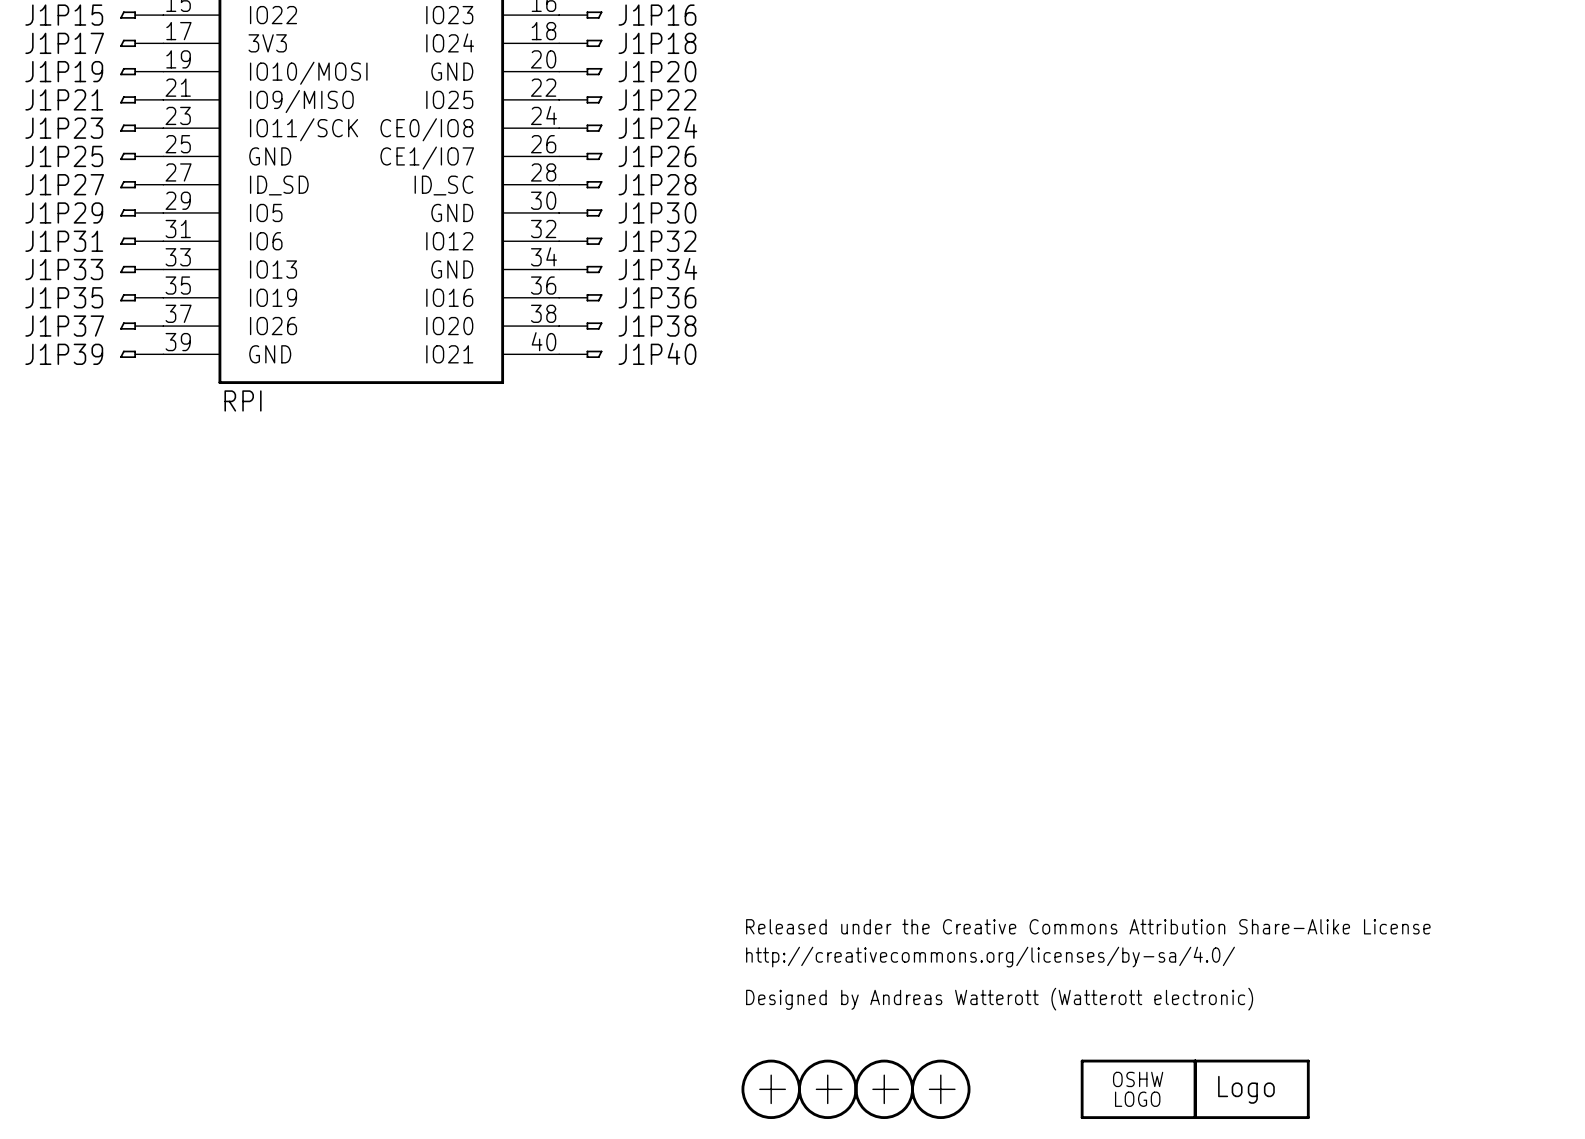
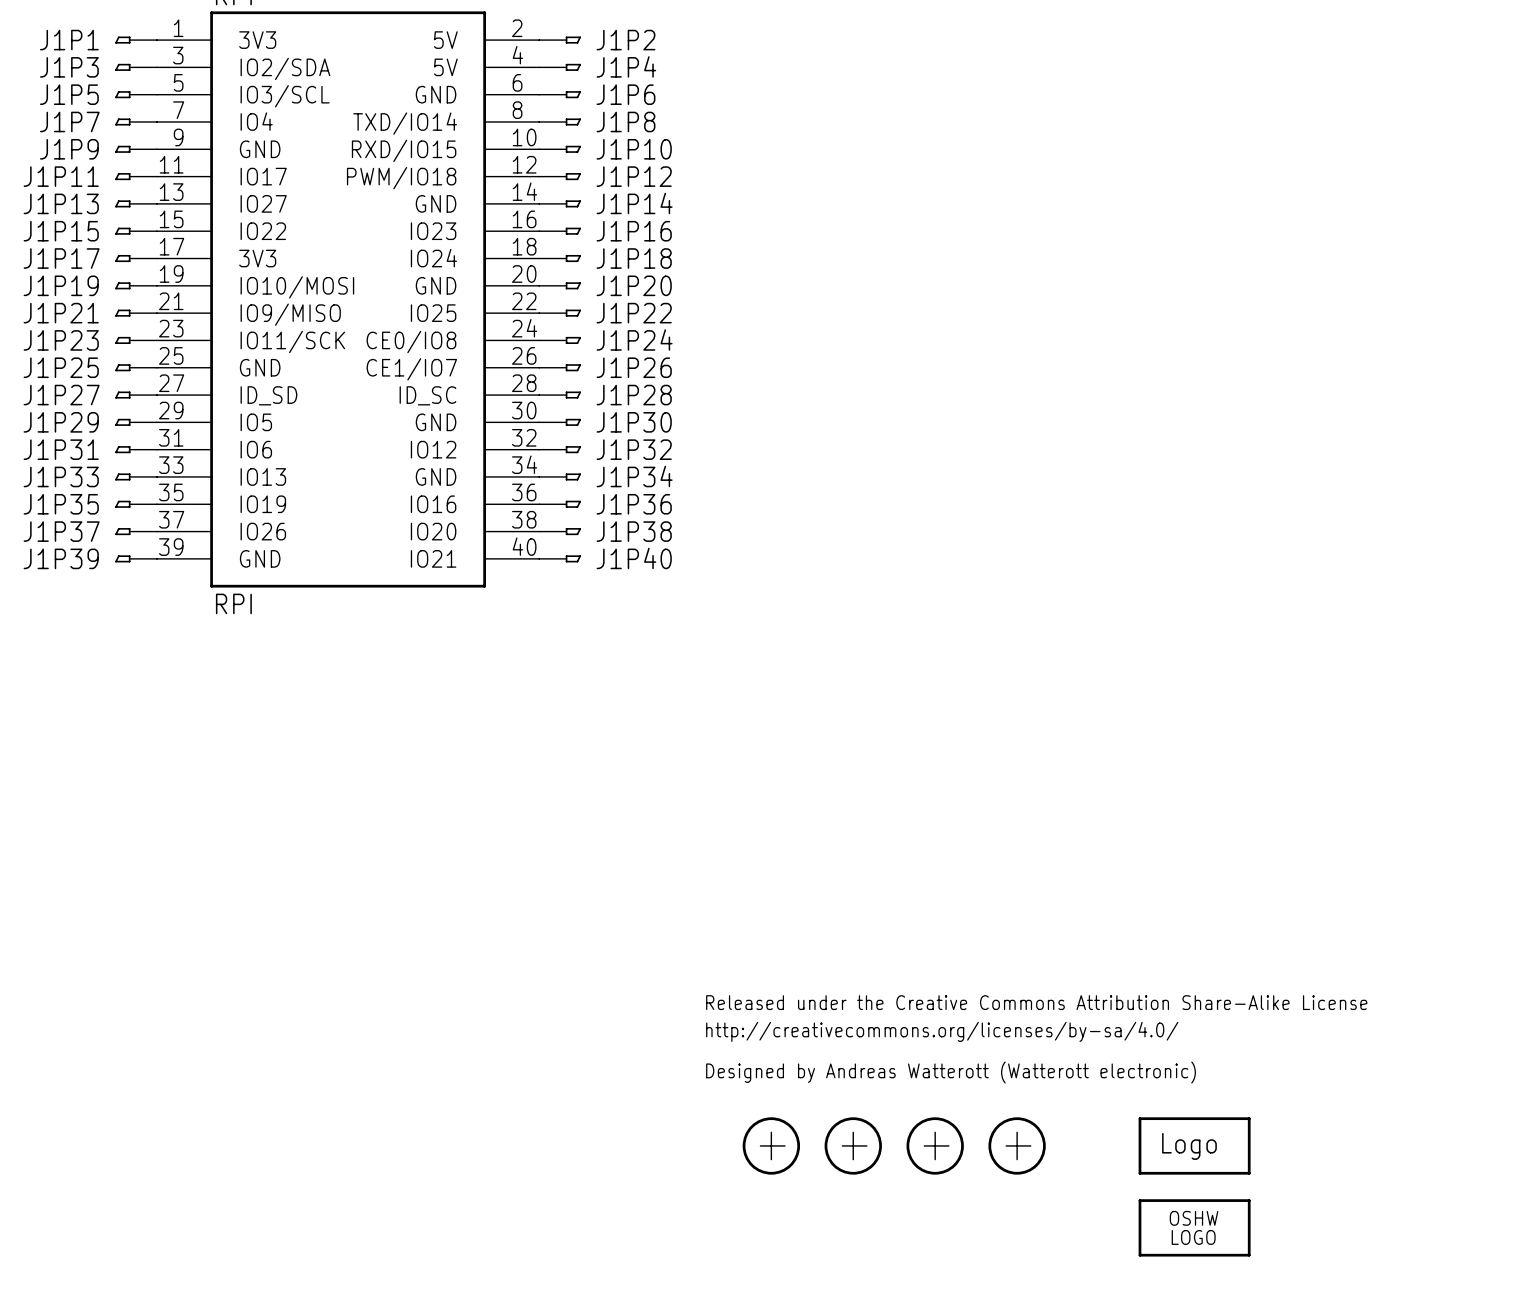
text position: Released under the Creative Commons Attribution Share-Alike License (1088, 926) -> Released under the Creative Commons Attribution Share-Alike License (1036, 1002)
text position: http://creativecommons.org/licenses/by-sa/4.0/ (990, 957) -> http://creativecommons.org/licenses/by-sa/4.0/ (942, 1031)
part: none -> (771, 1145)
part: none -> (853, 1145)
part: none -> (935, 1145)
part: none -> (1017, 1145)
text position: Designed by Andreas Watterott (Watterott electronic) (999, 999) -> Designed by Andreas Watterott (Watterott electronic) (951, 1072)
part: (771, 1089) -> none
part: (827, 1089) -> none
part: (884, 1089) -> none
part: (940, 1089) -> none
part position: (1138, 1089) -> (1194, 1227)
part position: (1251, 1089) -> (1194, 1145)

